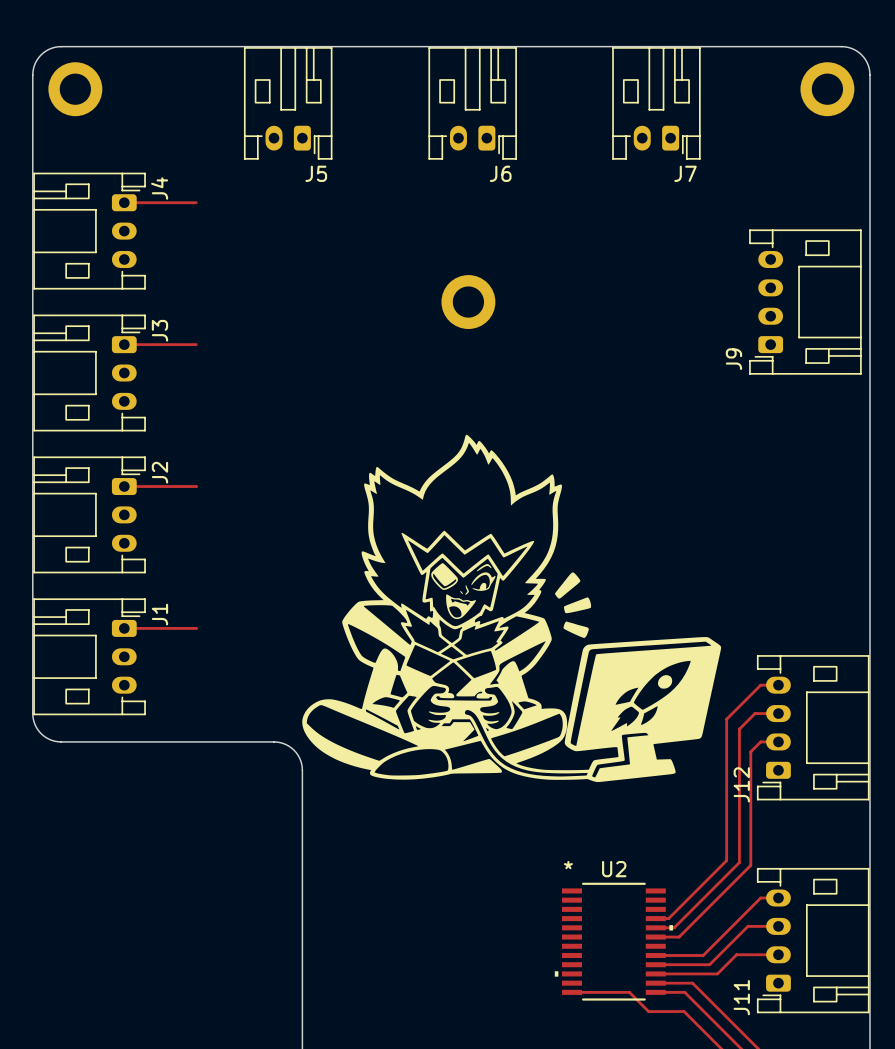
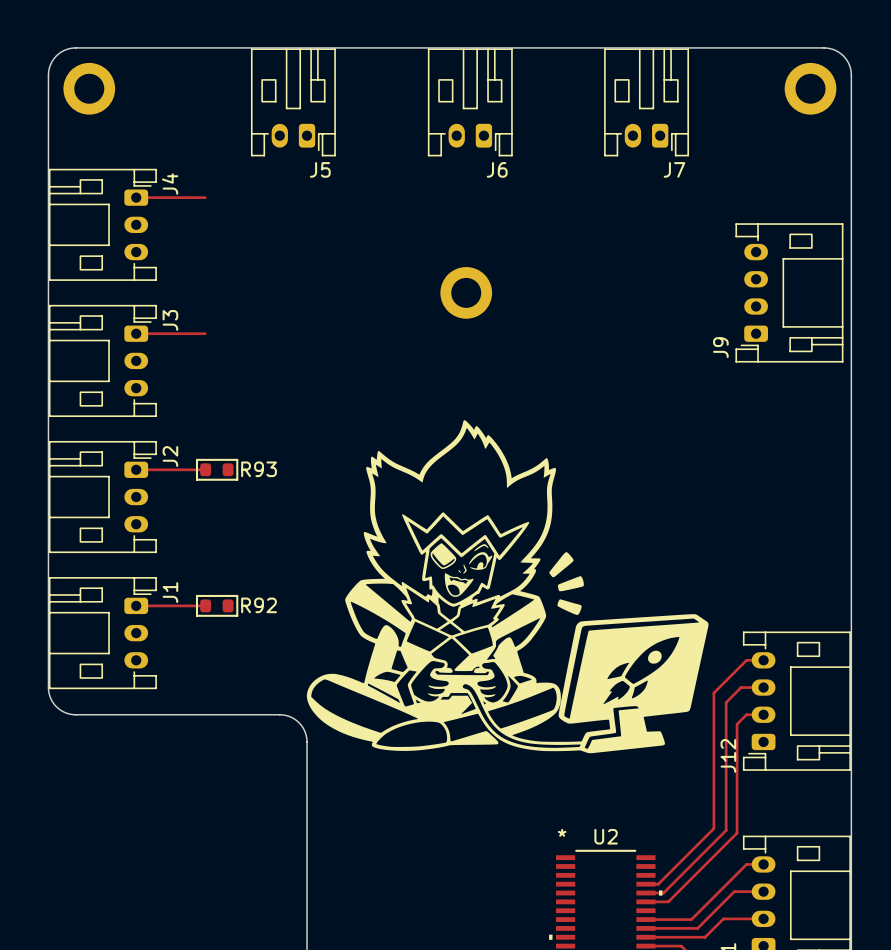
R93: none -> (217, 469)
R92: none -> (217, 605)

